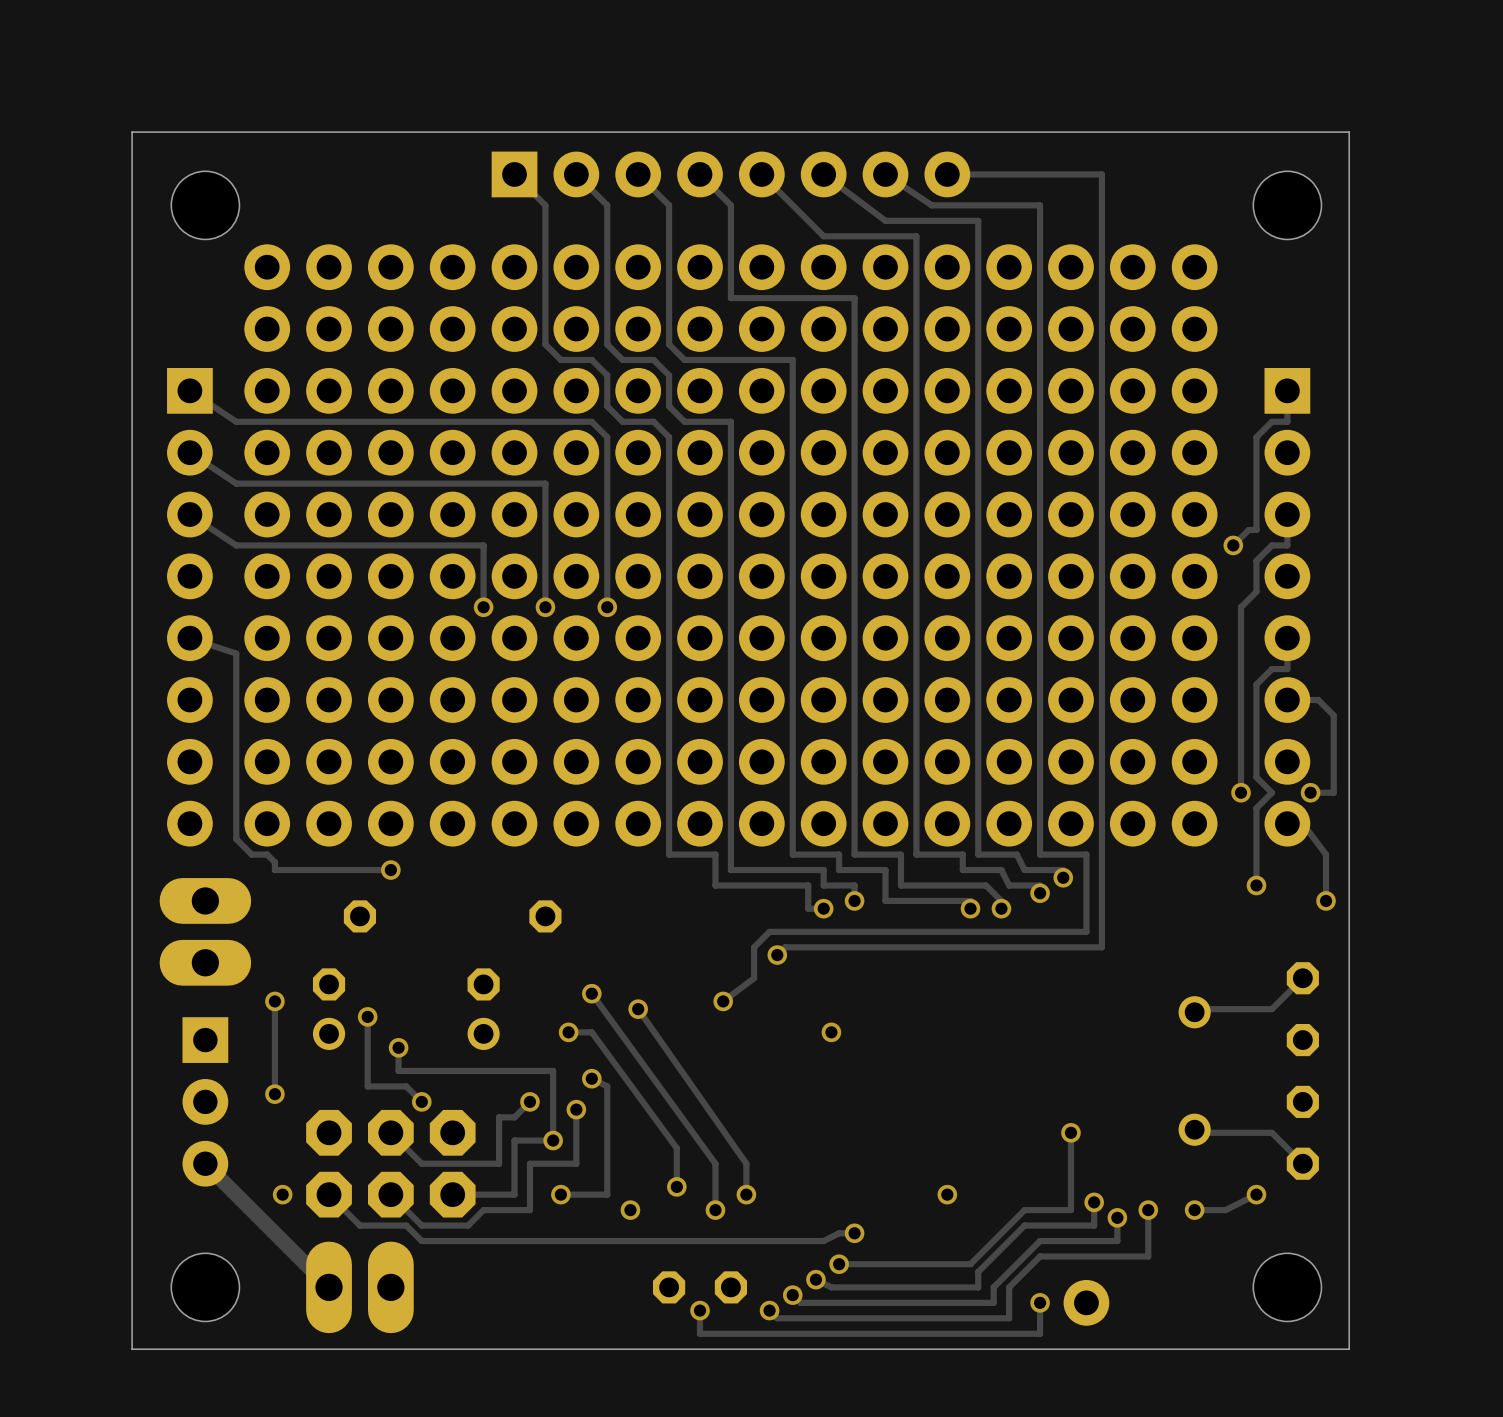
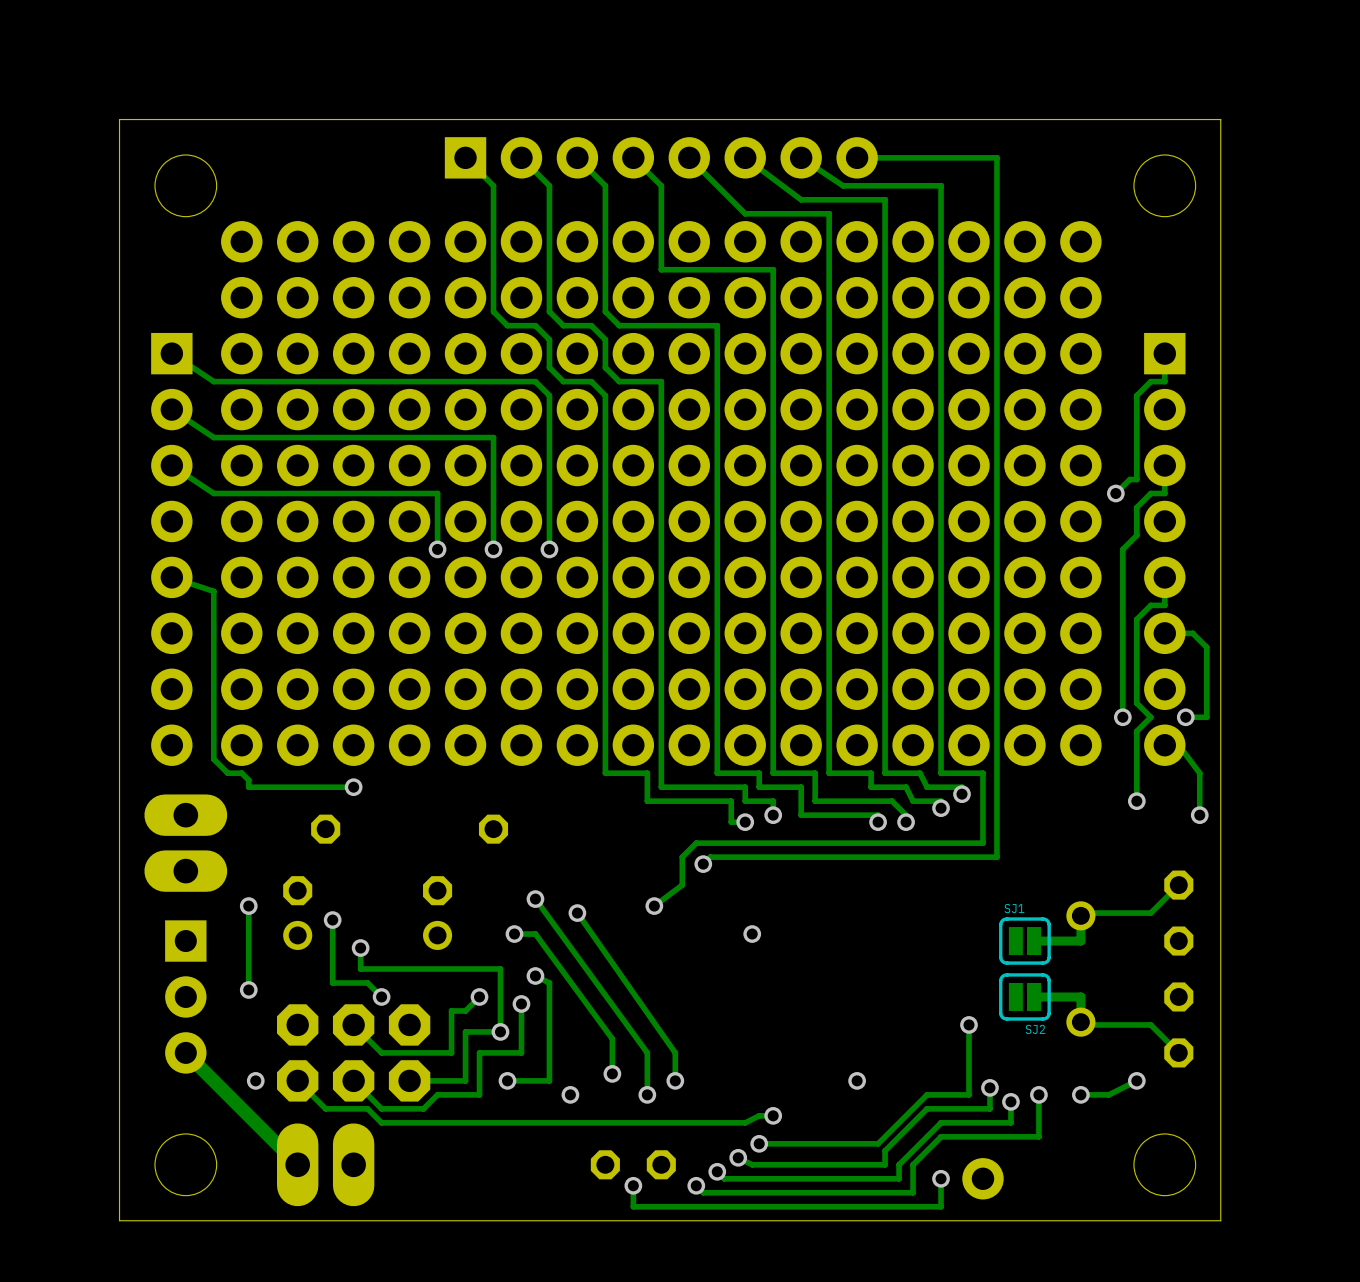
track: none -> (1080, 913) (1080, 941) (1038, 941)
SJ1: none -> (1024, 941)
SJ2: none -> (1024, 996)
track: none -> (1038, 996) (1080, 996) (1080, 1024)

